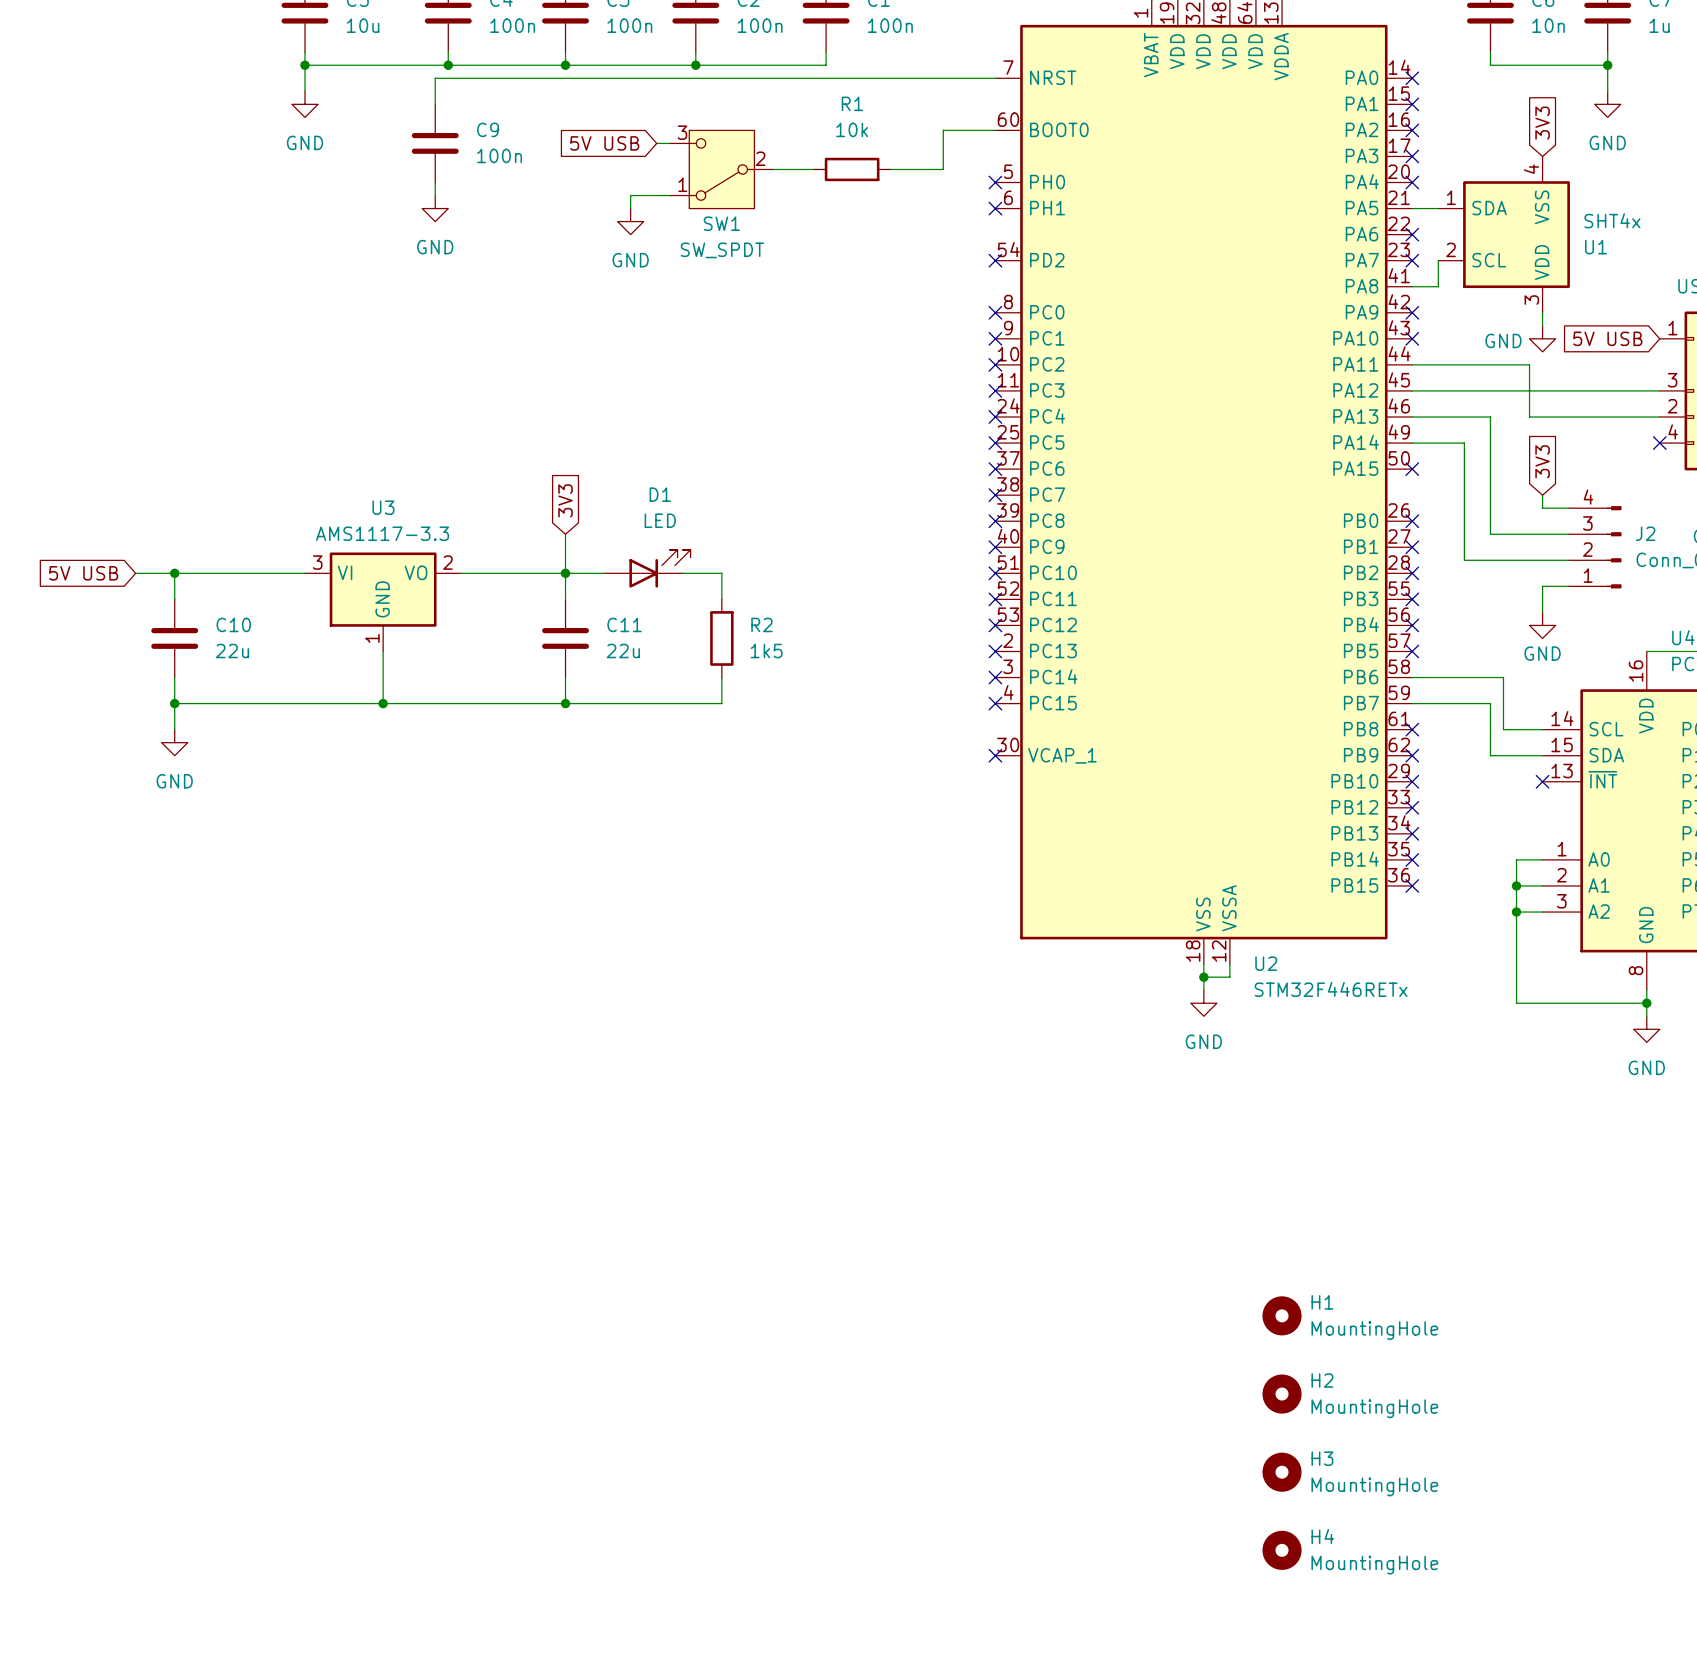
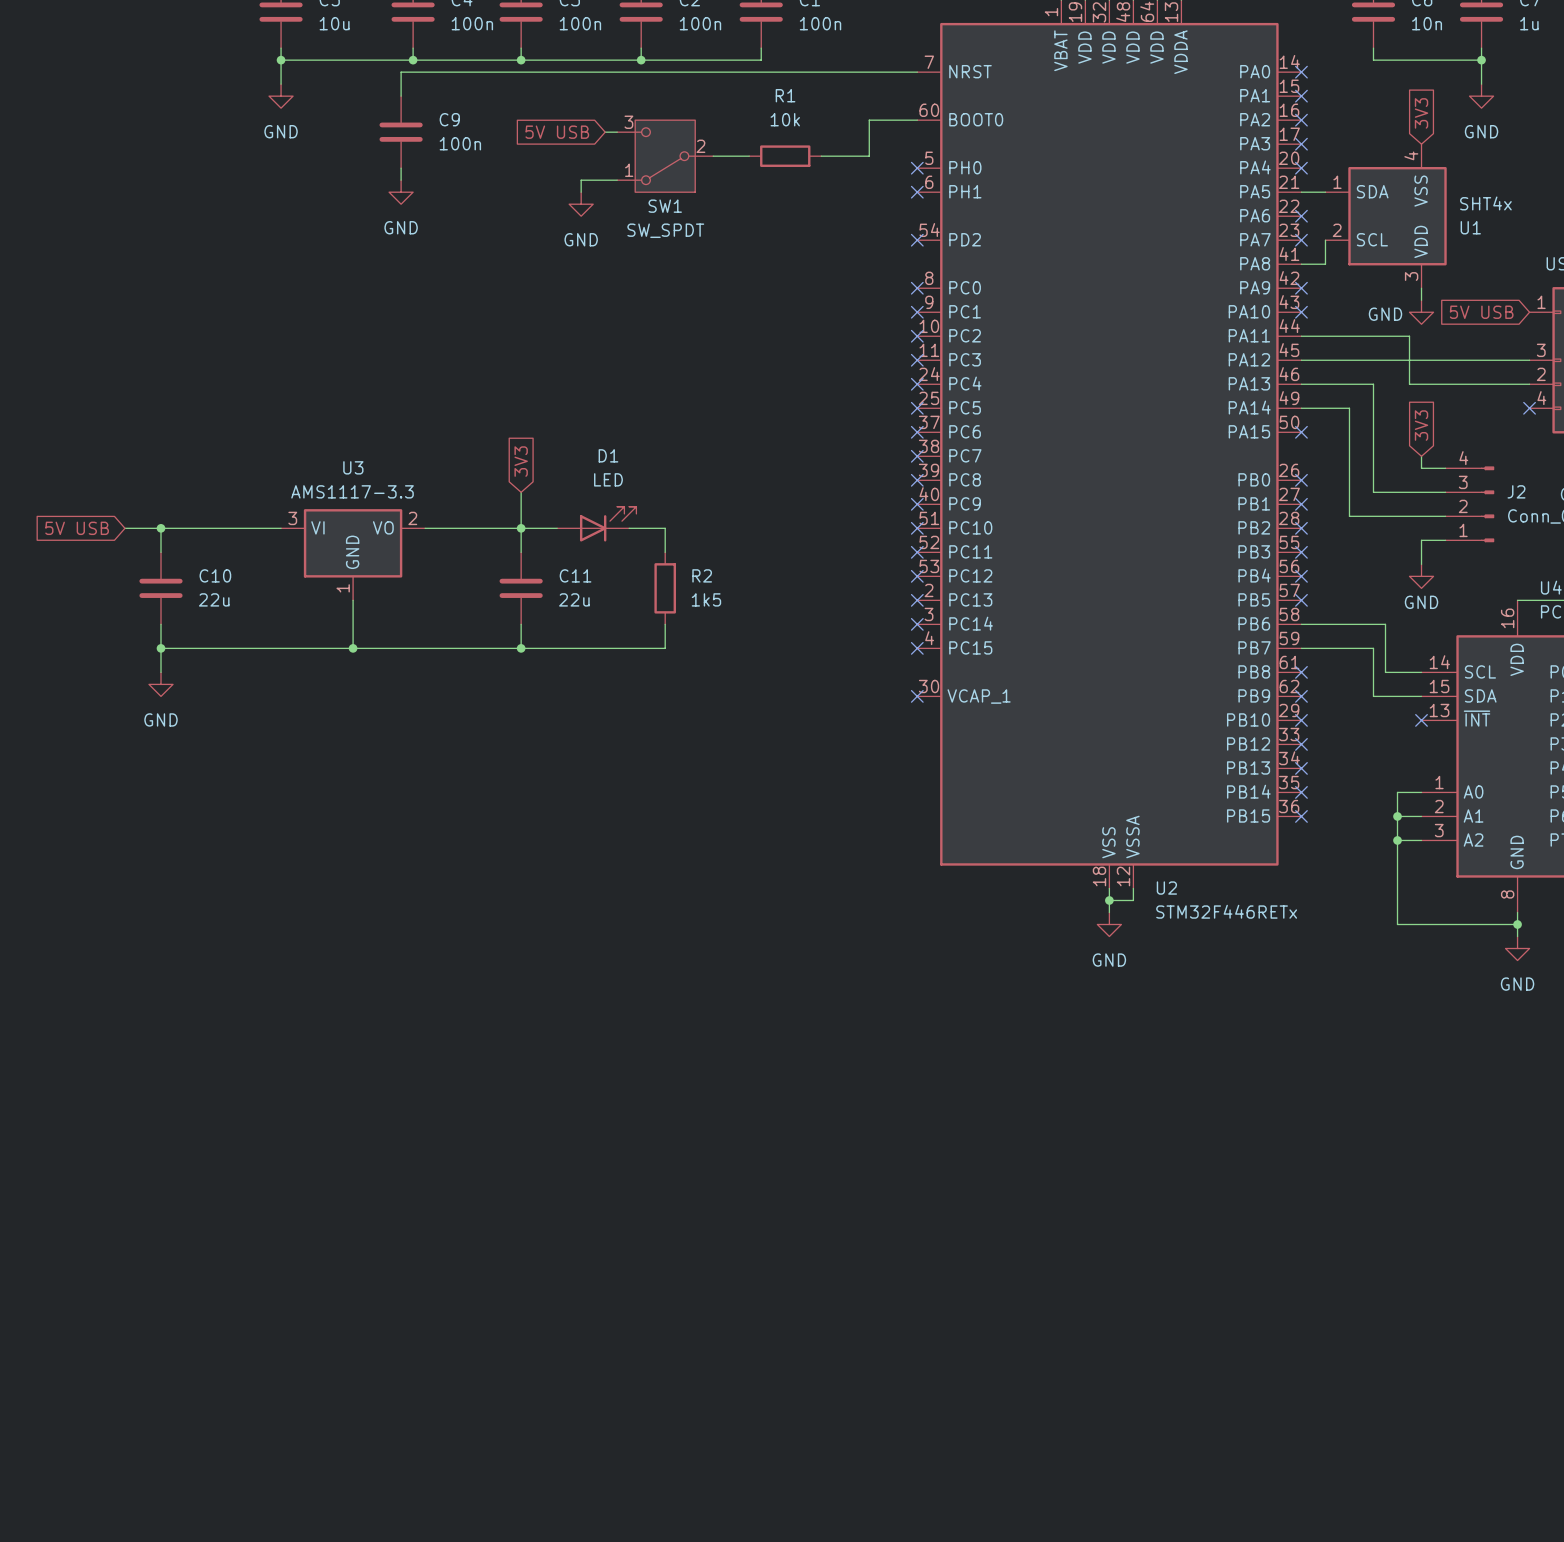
H1: MountingHole (1282, 1315) -> none
H2: MountingHole (1282, 1394) -> none
H3: MountingHole (1282, 1472) -> none
H4: MountingHole (1282, 1550) -> none

